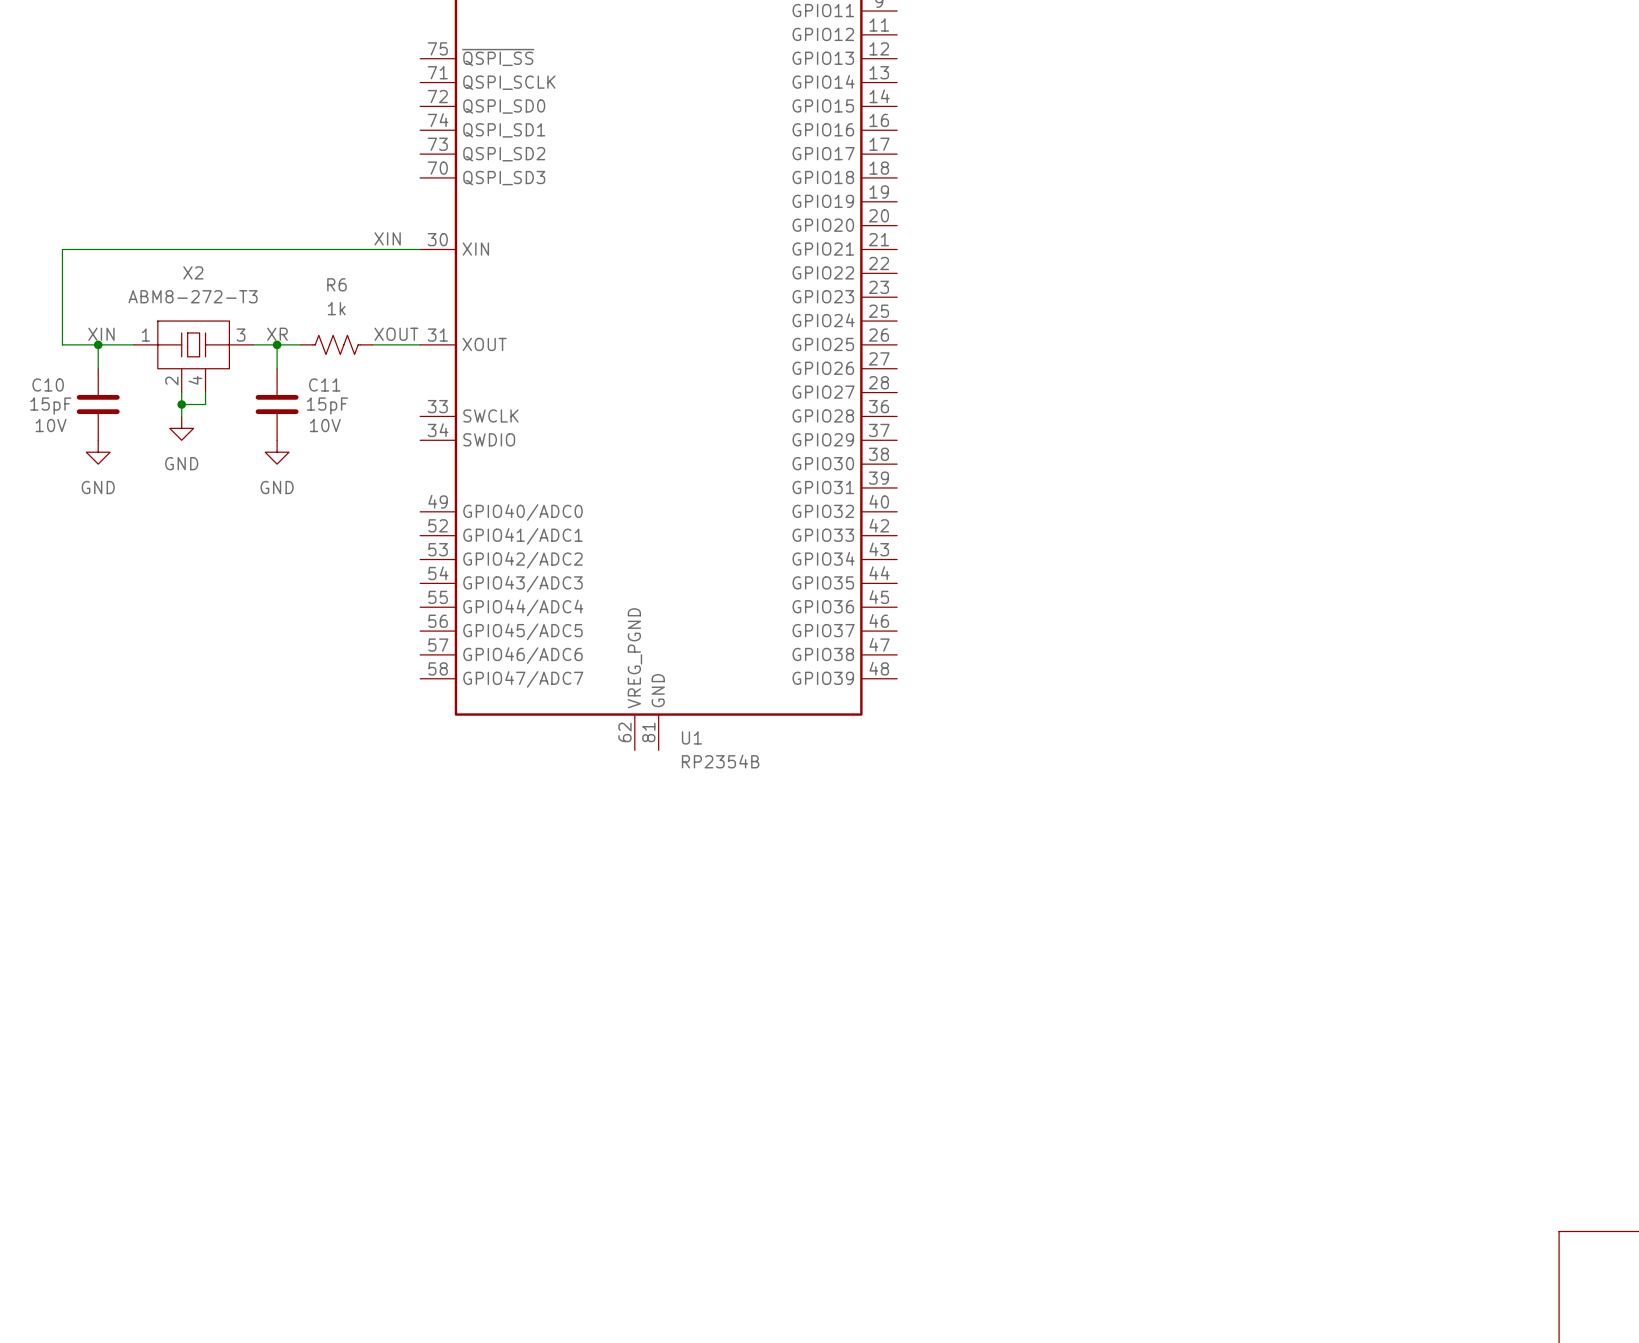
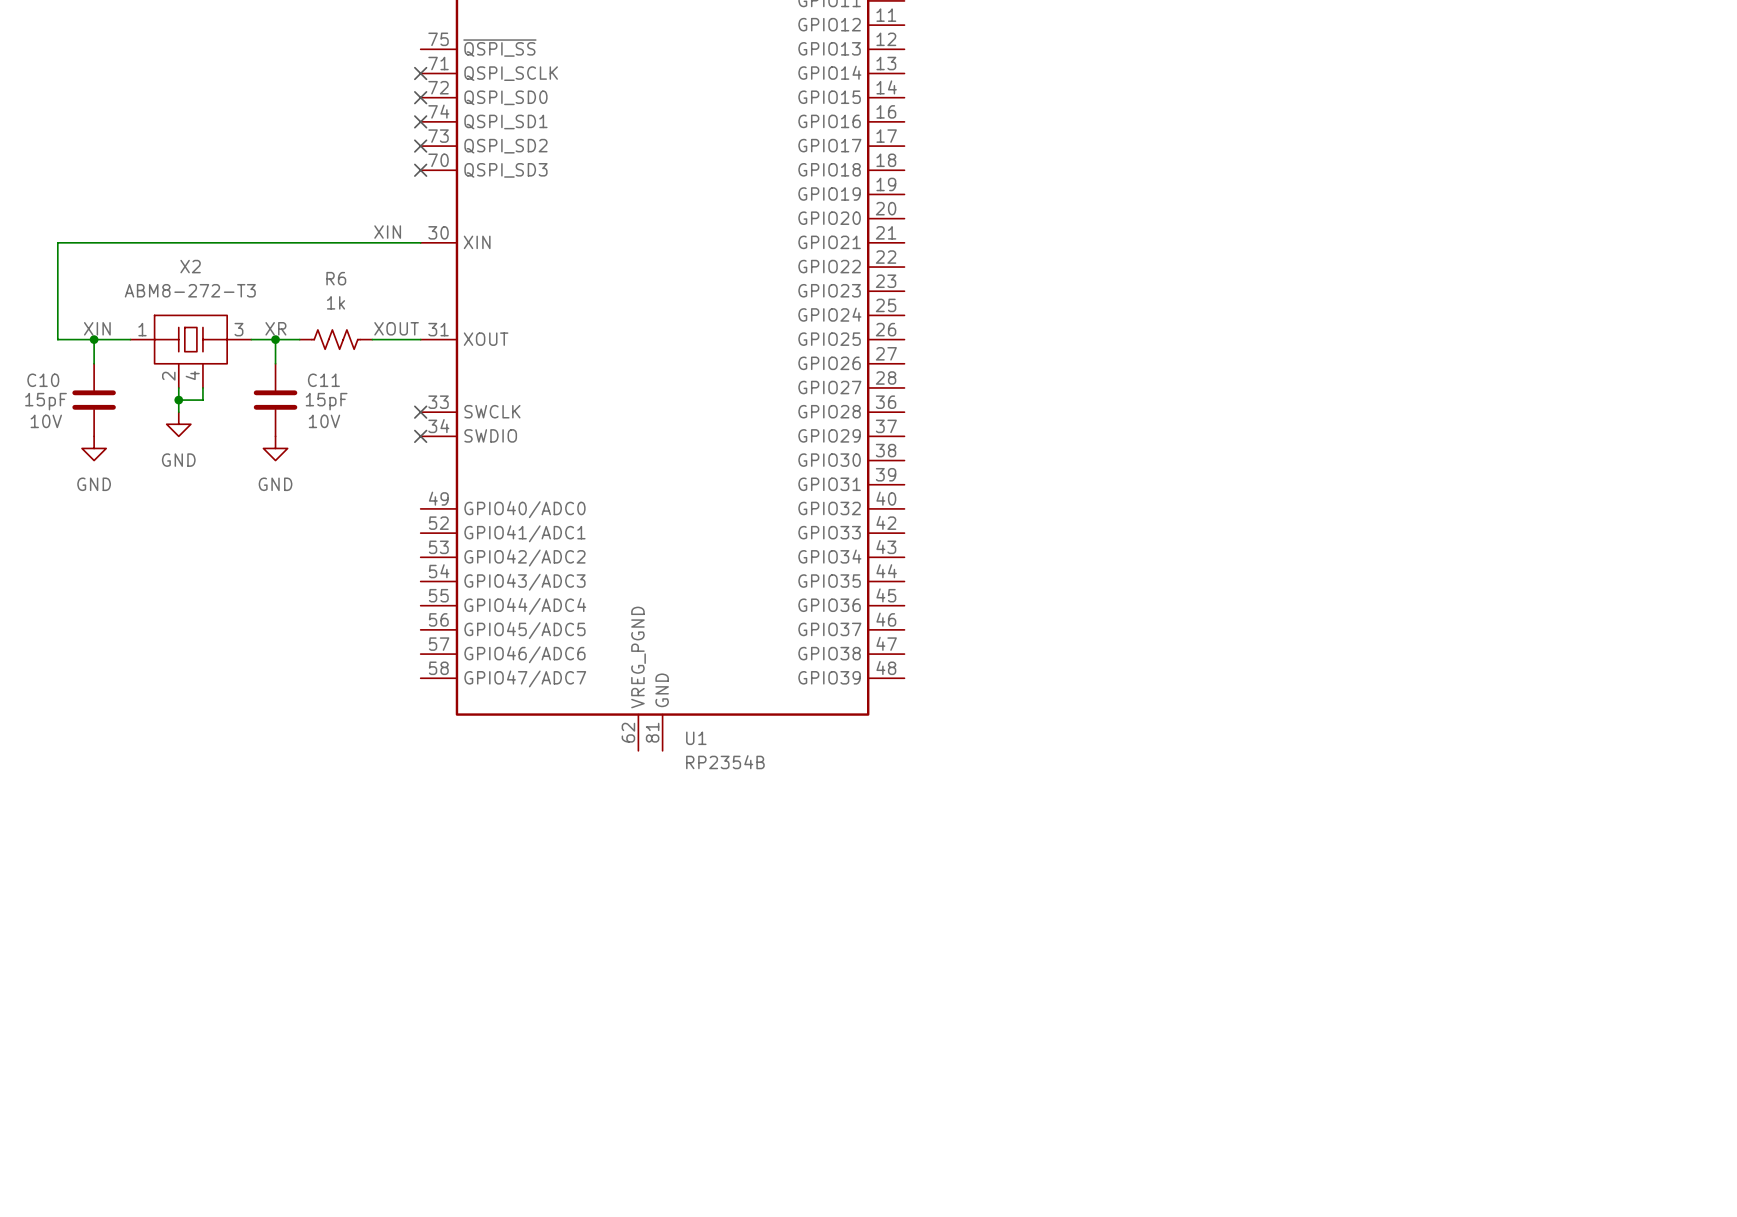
no-connect mark: none -> (420, 73)
no-connect mark: none -> (420, 97)
no-connect mark: none -> (420, 121)
no-connect mark: none -> (420, 146)
no-connect mark: none -> (420, 170)
no-connect mark: none -> (420, 412)
no-connect mark: none -> (420, 436)

